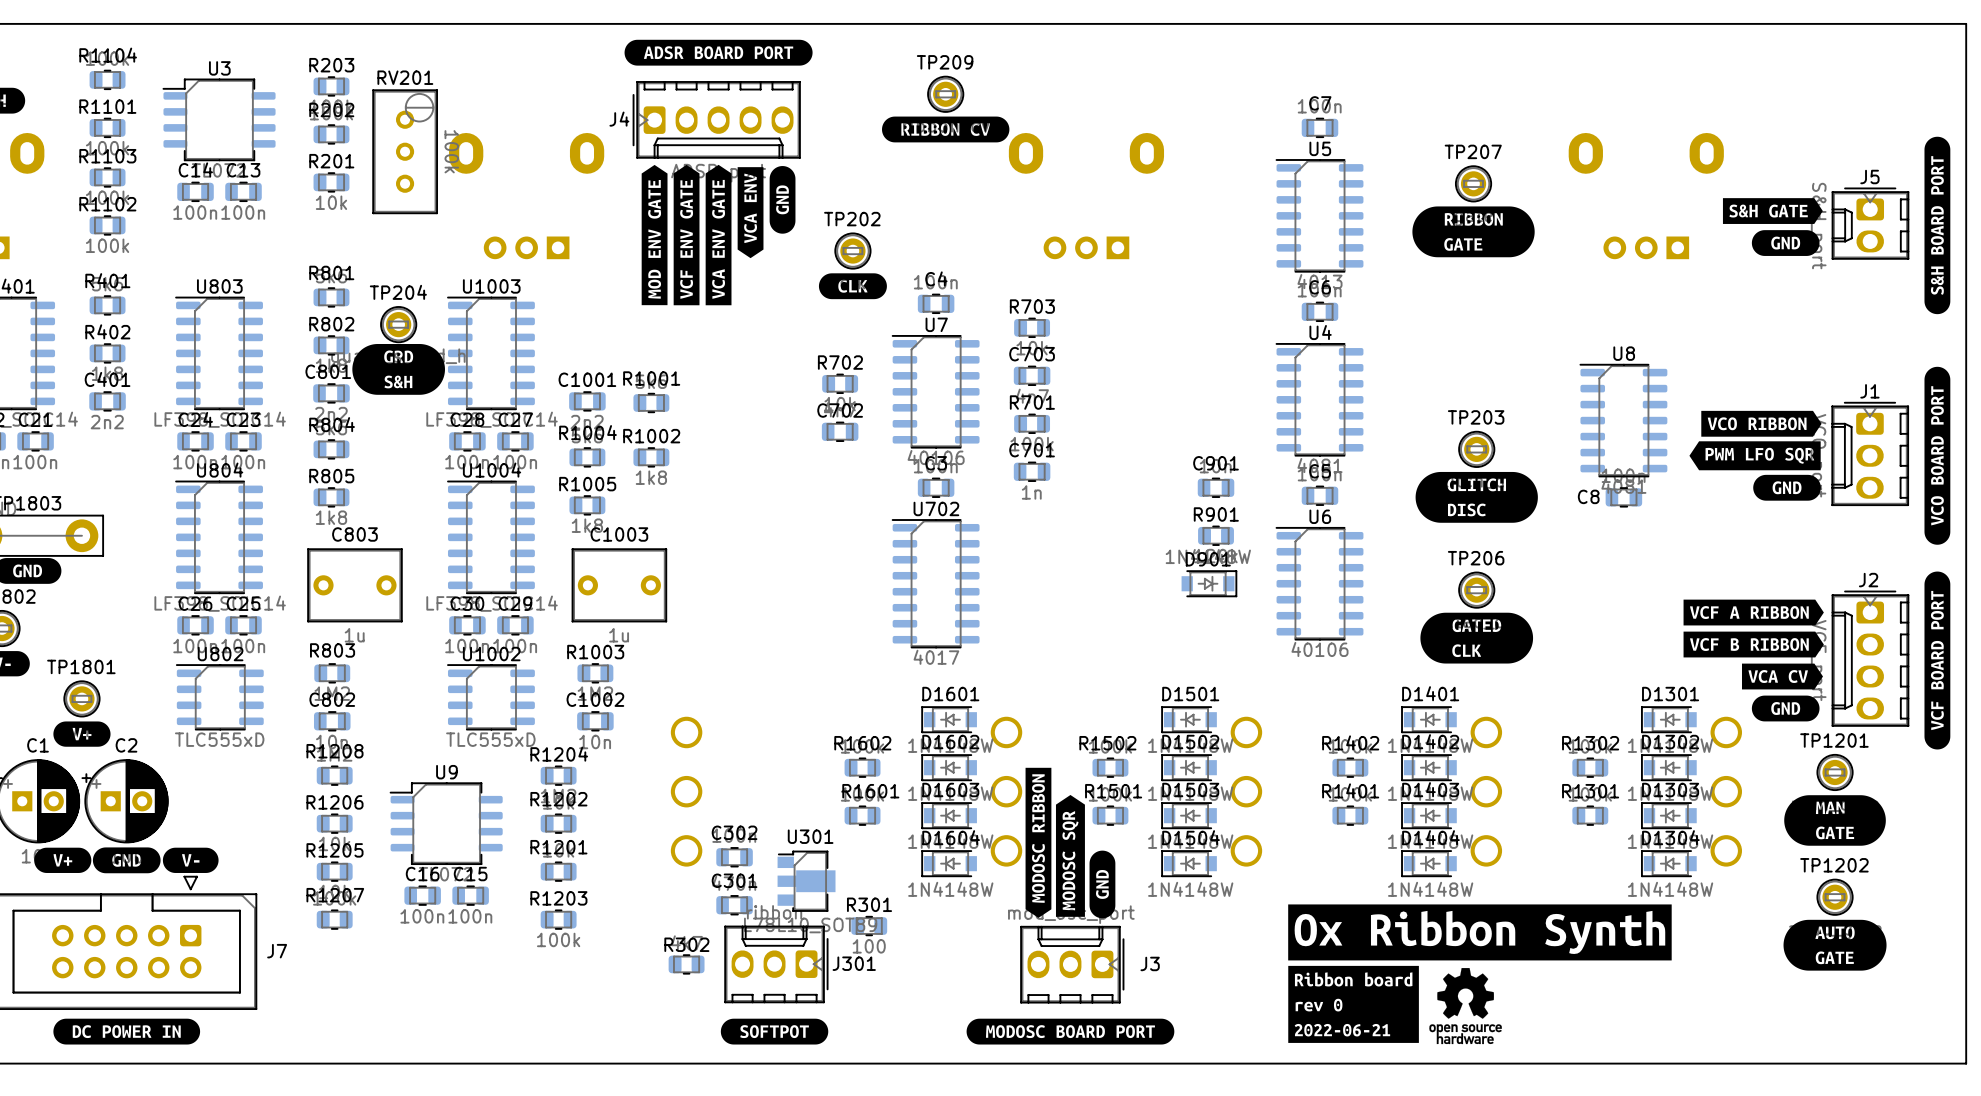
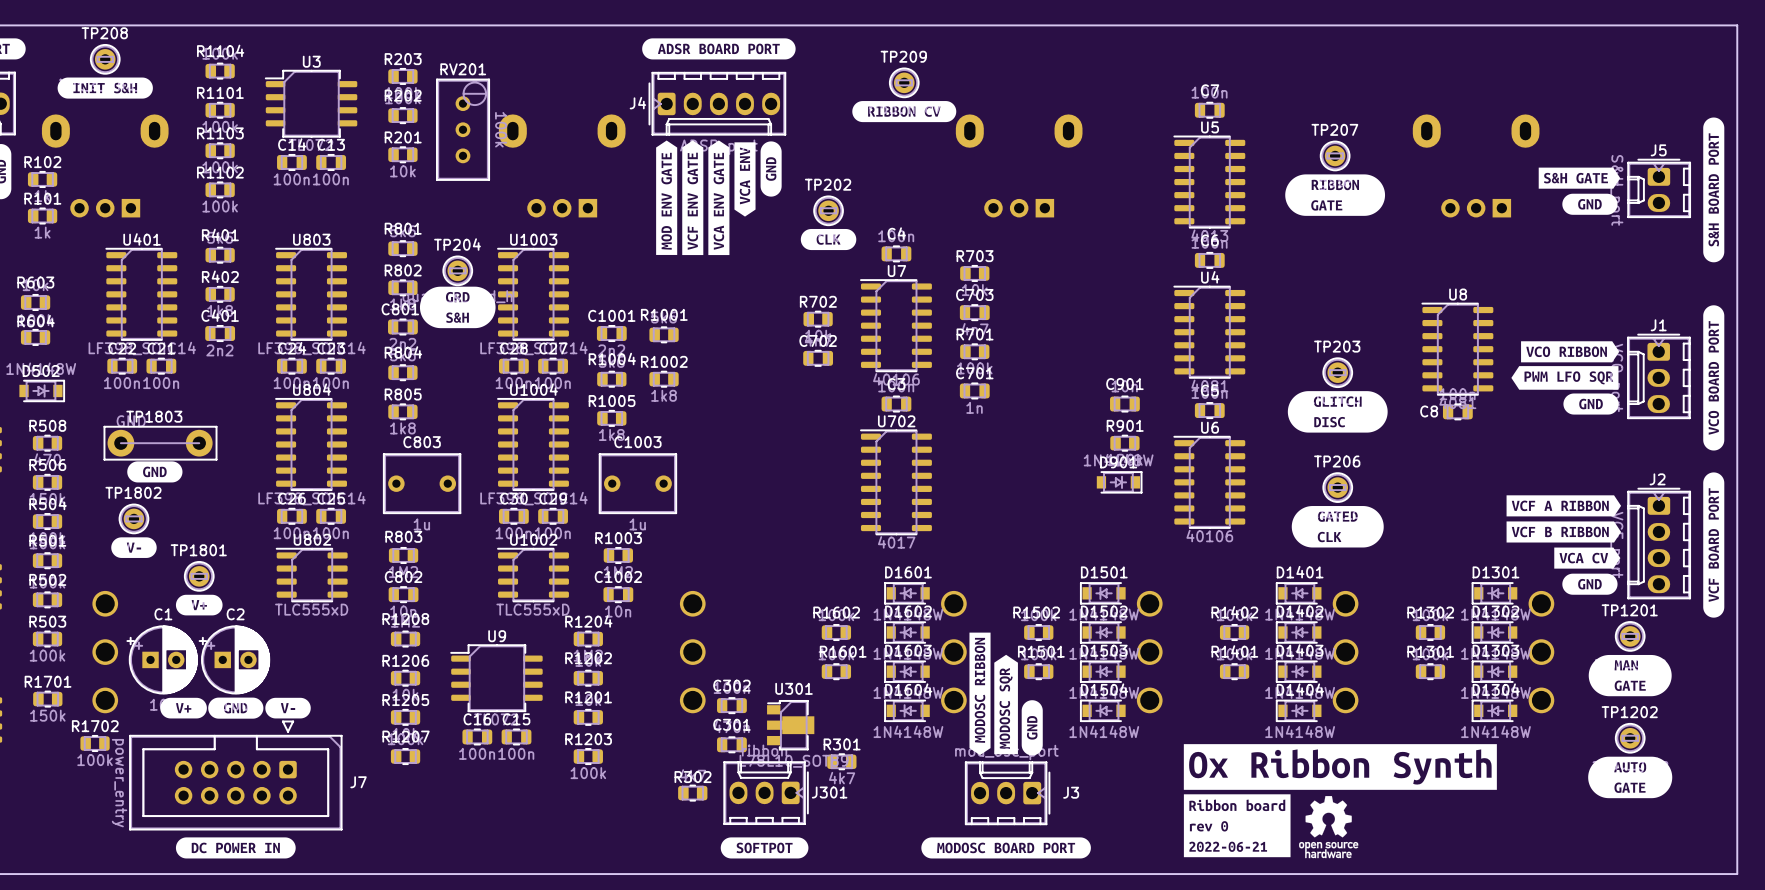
R301 value: 100 (869, 946) -> 4k7 (842, 778)

